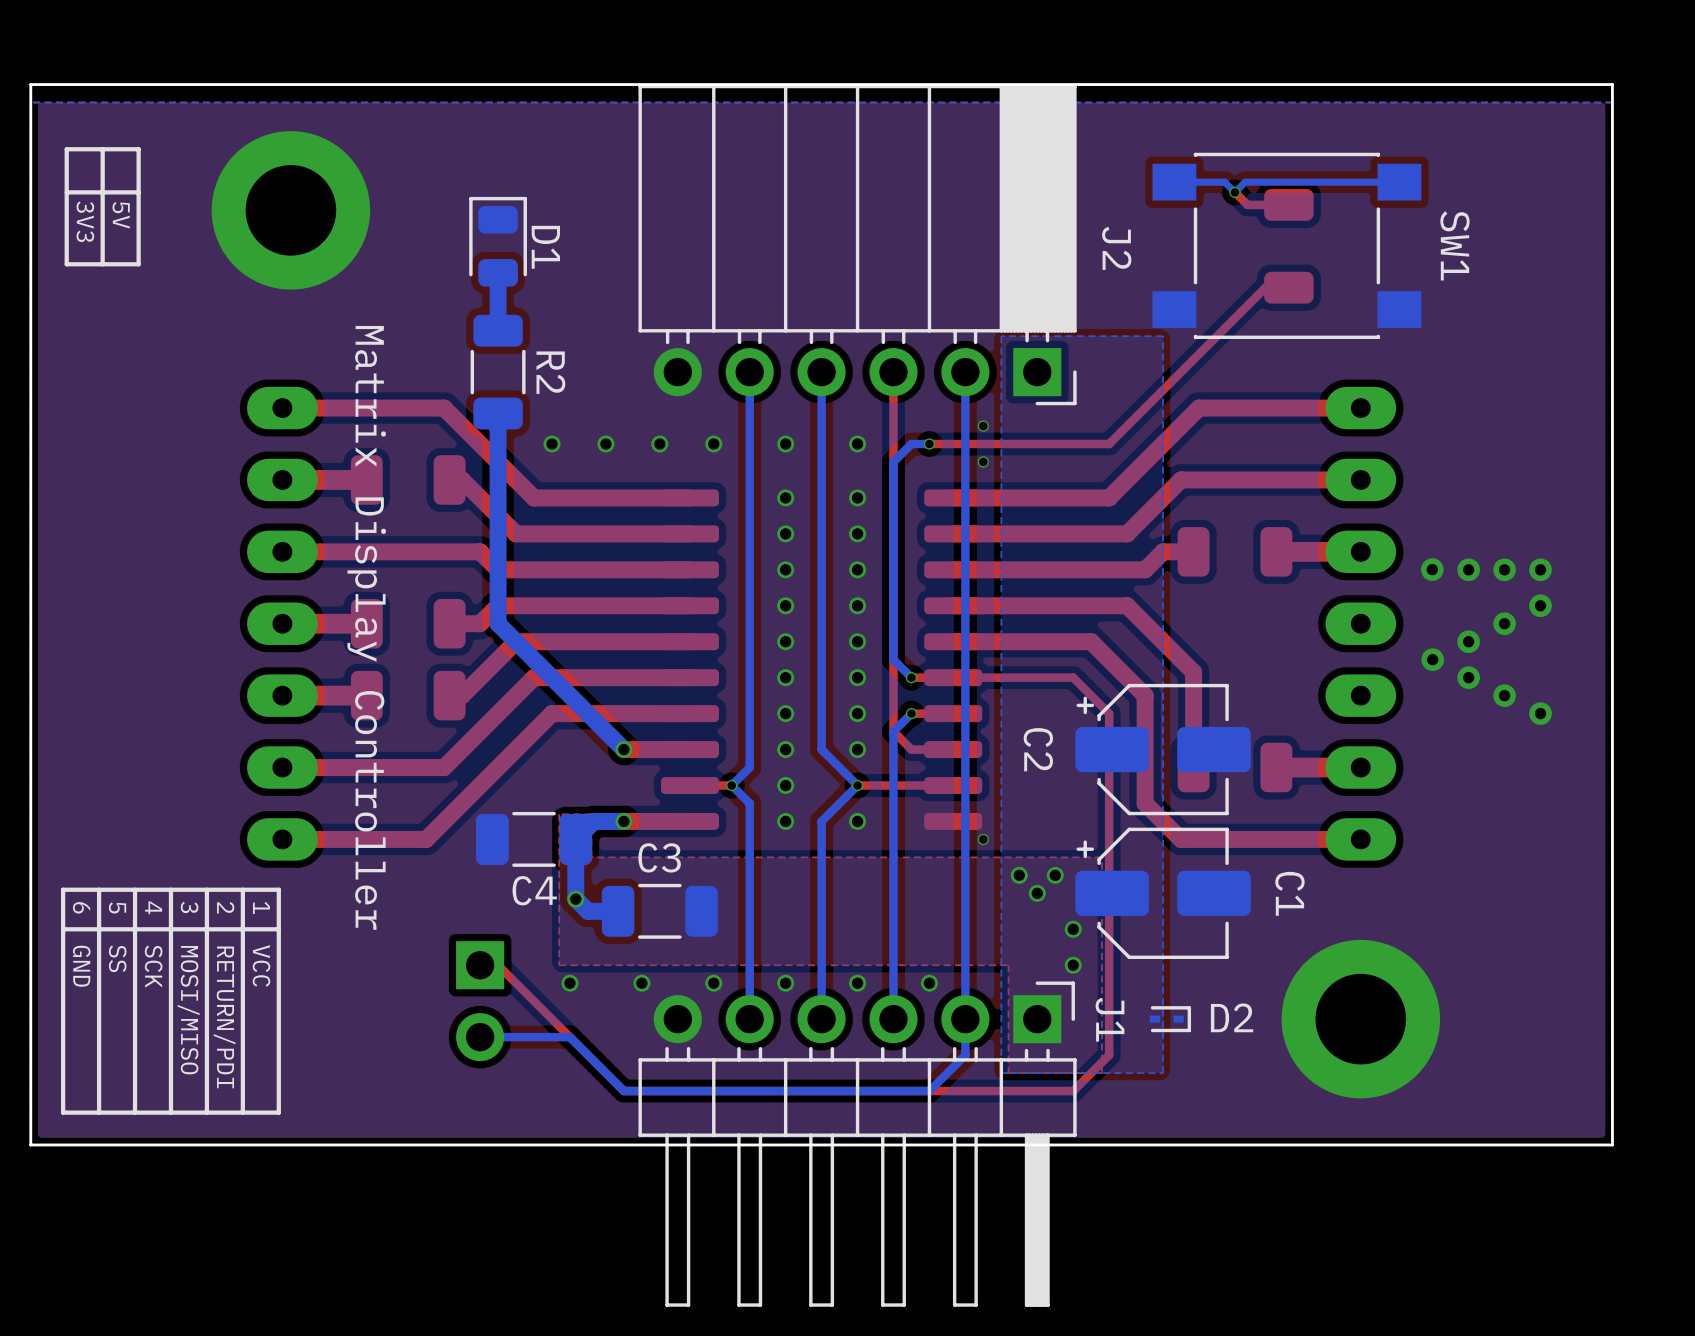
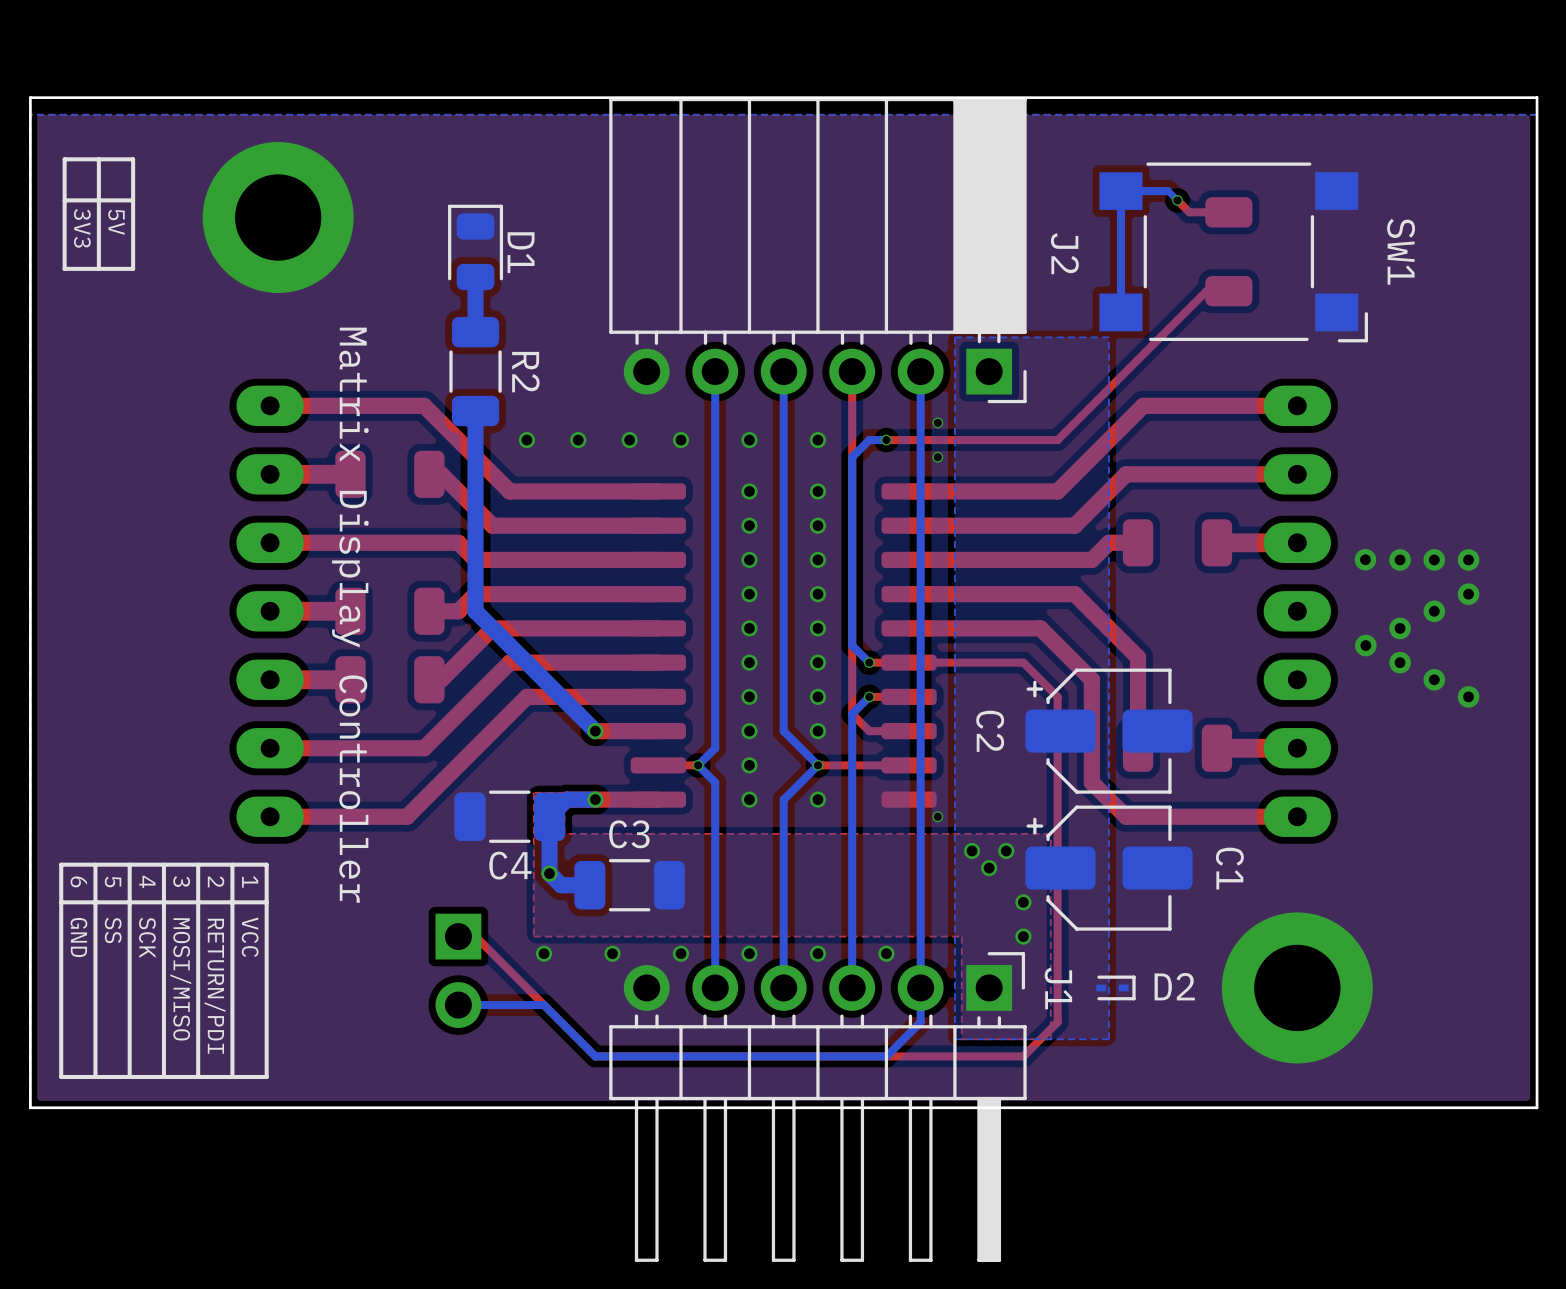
SW1 footprint: [1152, 152, 1422, 340] -> [1099, 162, 1368, 343]
bottom track: (1174, 182) (1225, 182) -> (1121, 312) (1121, 191) (1168, 191)
bottom track: (1399, 182) (1245, 182) (1234, 192) -> none

